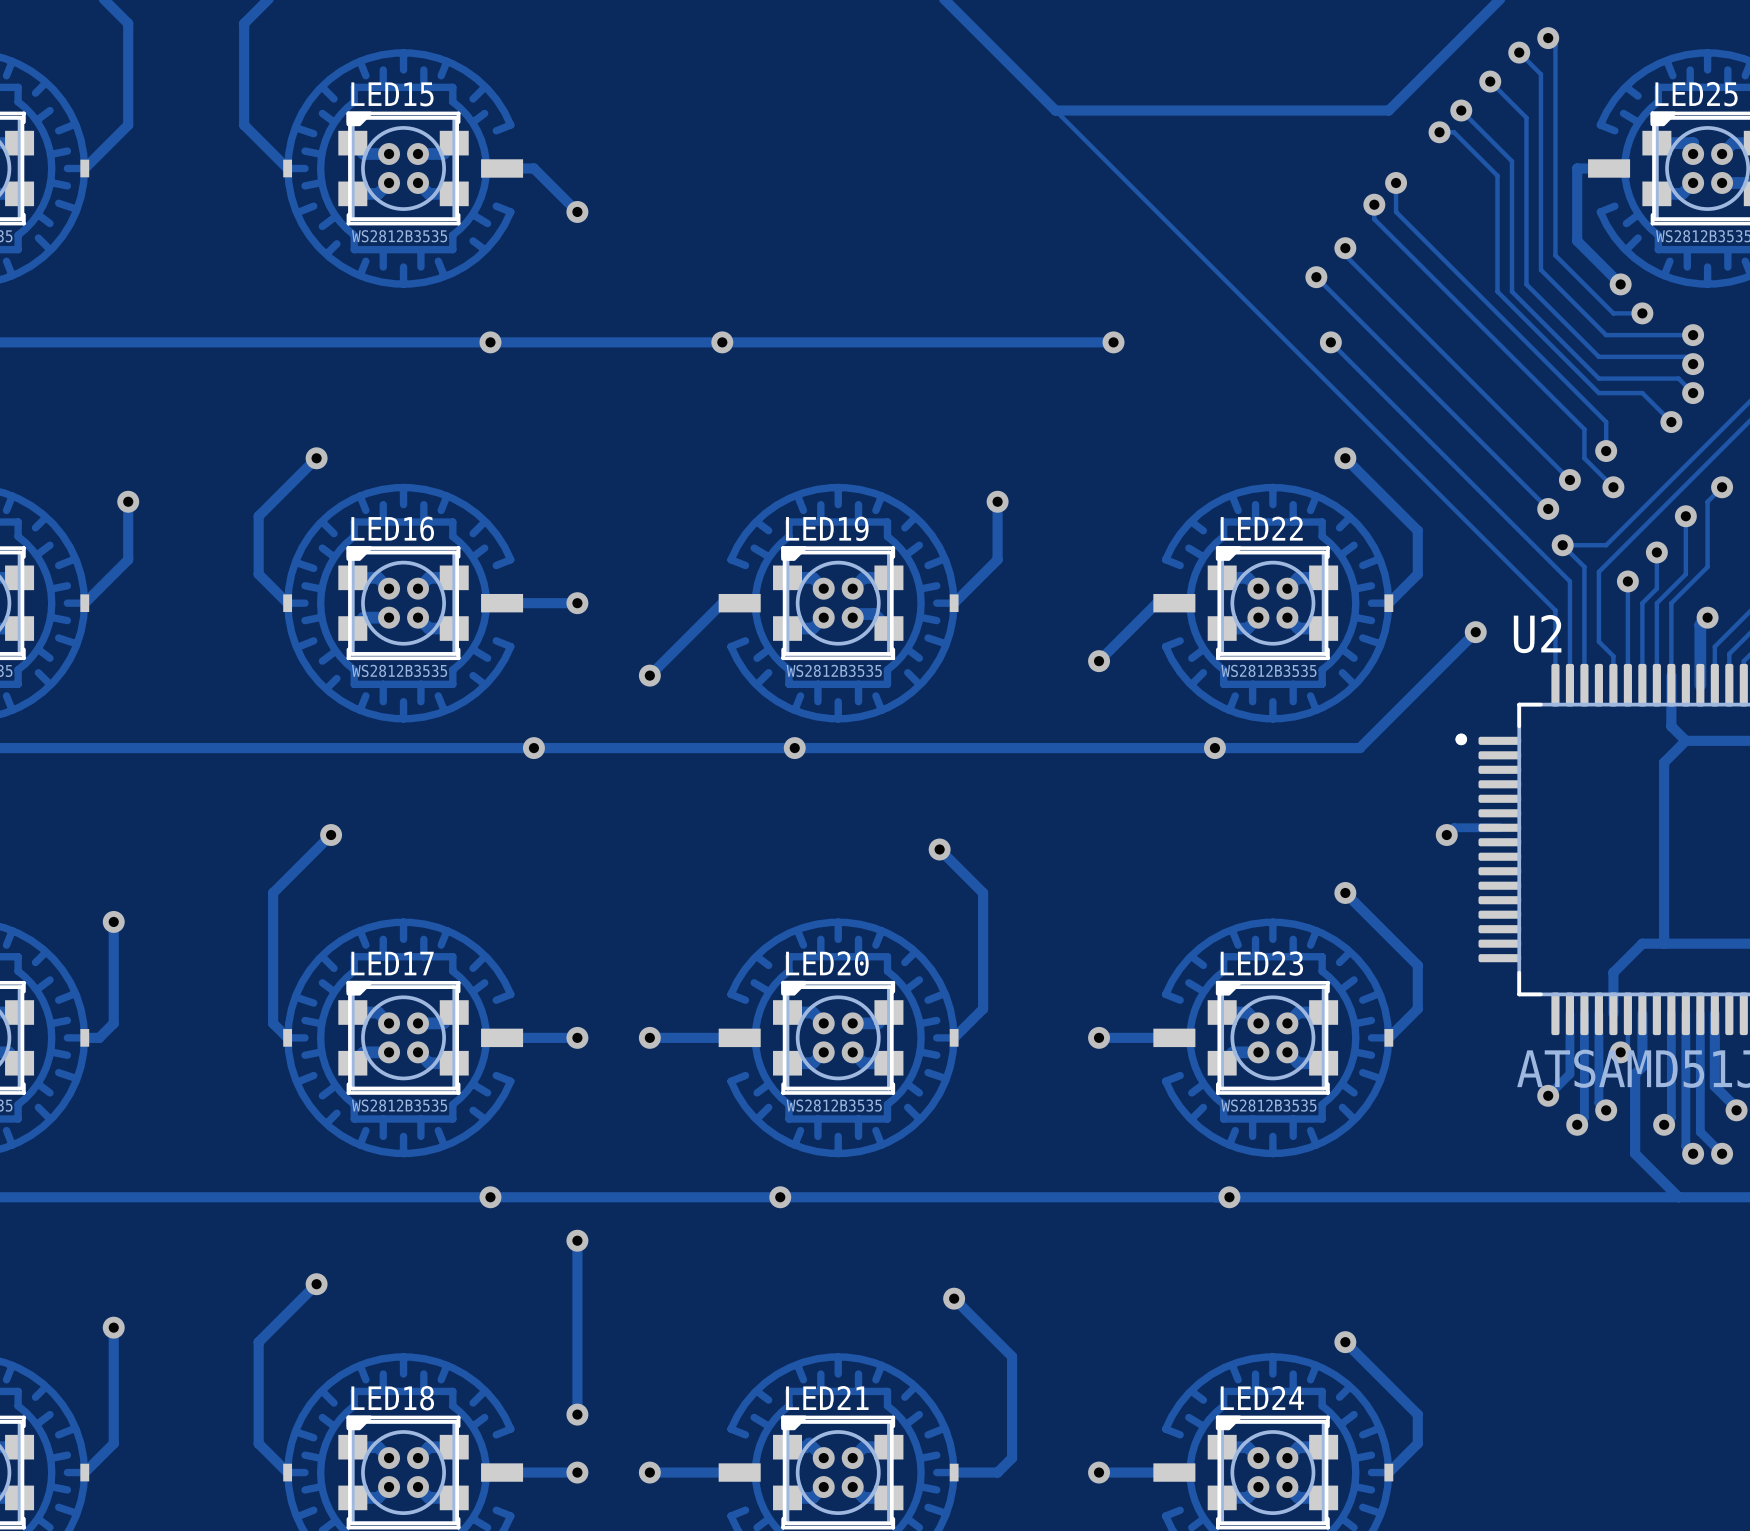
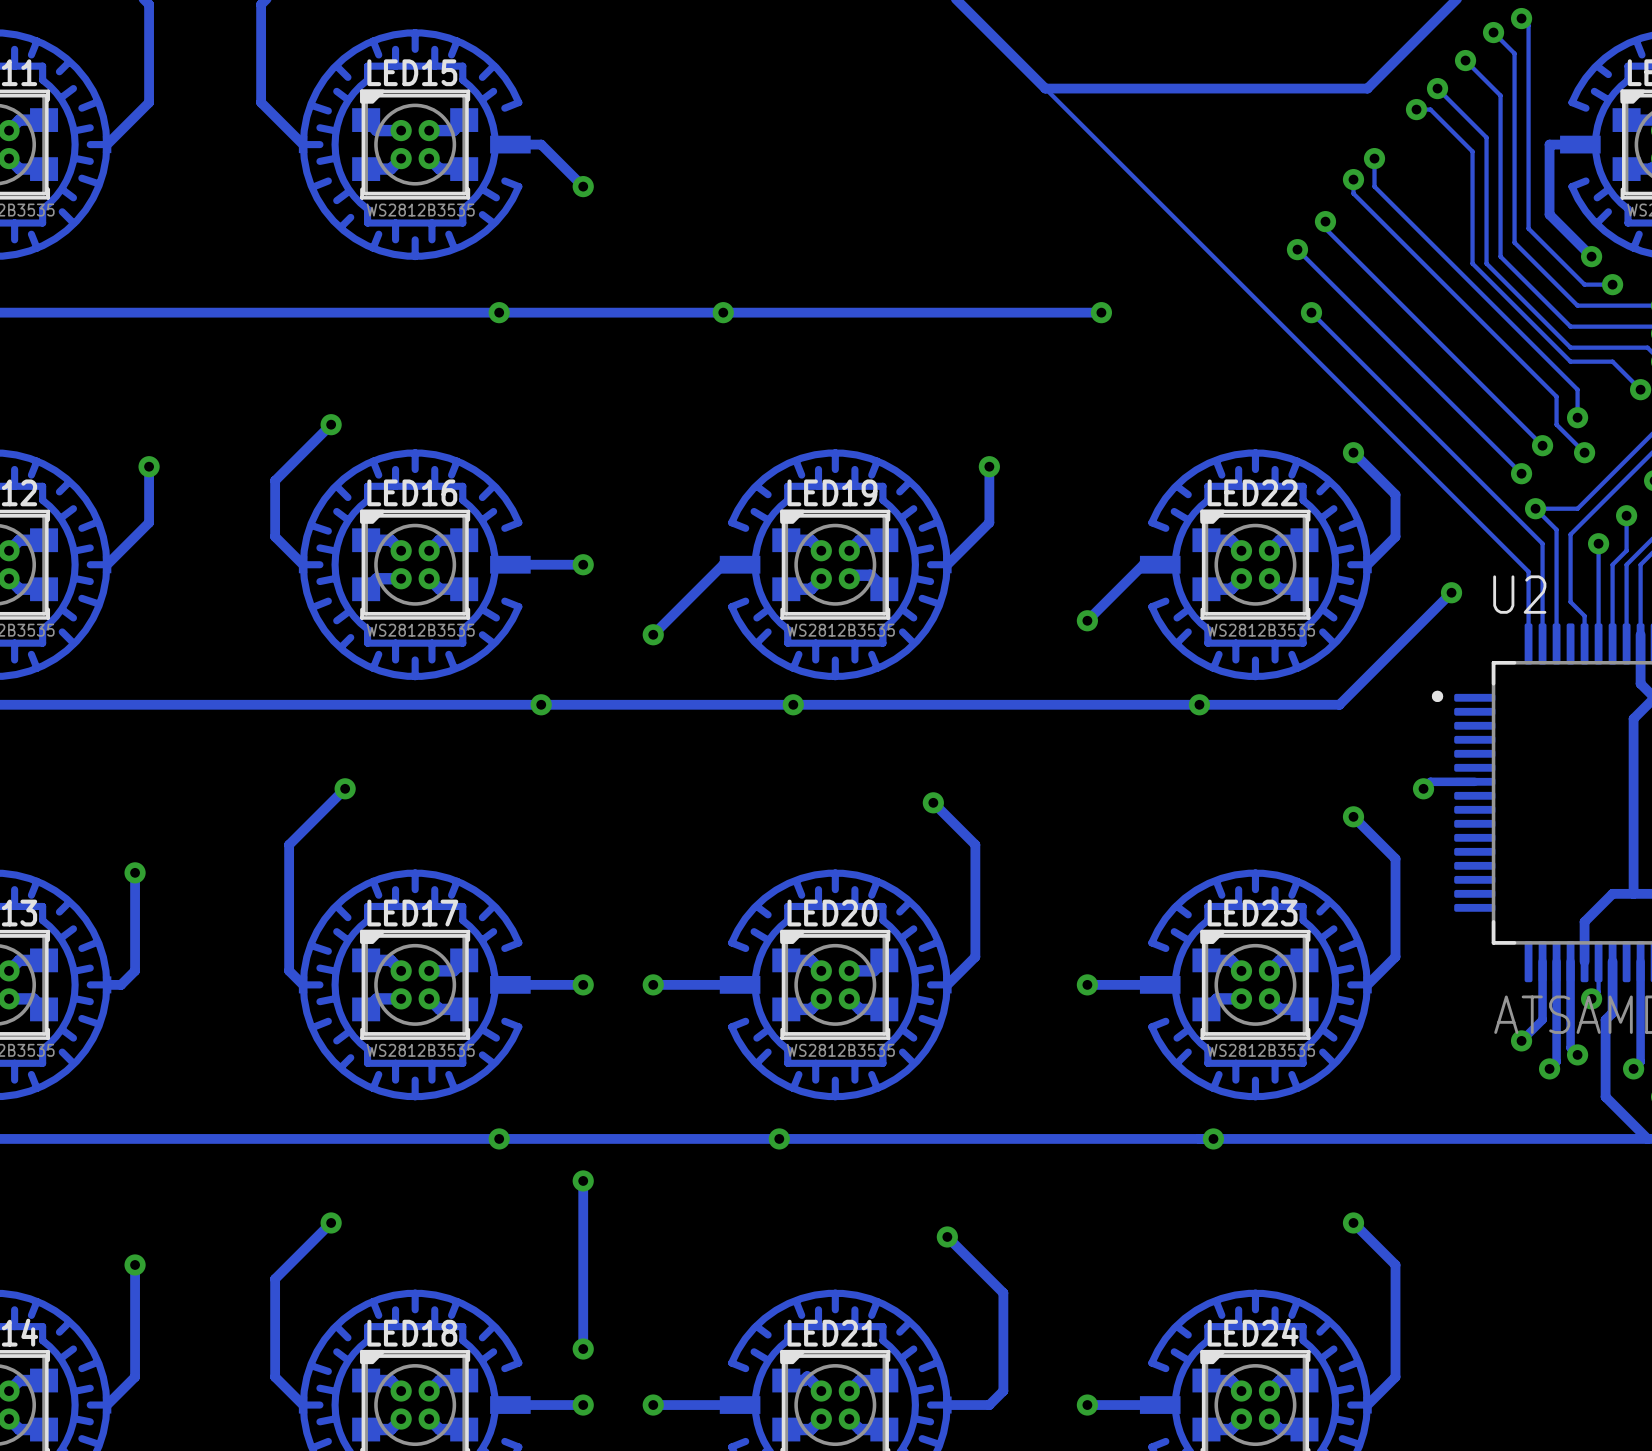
track: (1345, 458) (1374, 487) -> none
via position: (1345, 458) -> (1353, 452)
track: (1345, 892) (1417, 965) -> (1353, 816) (1395, 858) (1395, 914)
via position: (1345, 892) -> (1353, 816)
track: (1345, 1342) (1417, 1414) -> (1353, 1222) (1395, 1264) (1395, 1349)
via position: (1345, 1342) -> (1353, 1222)

